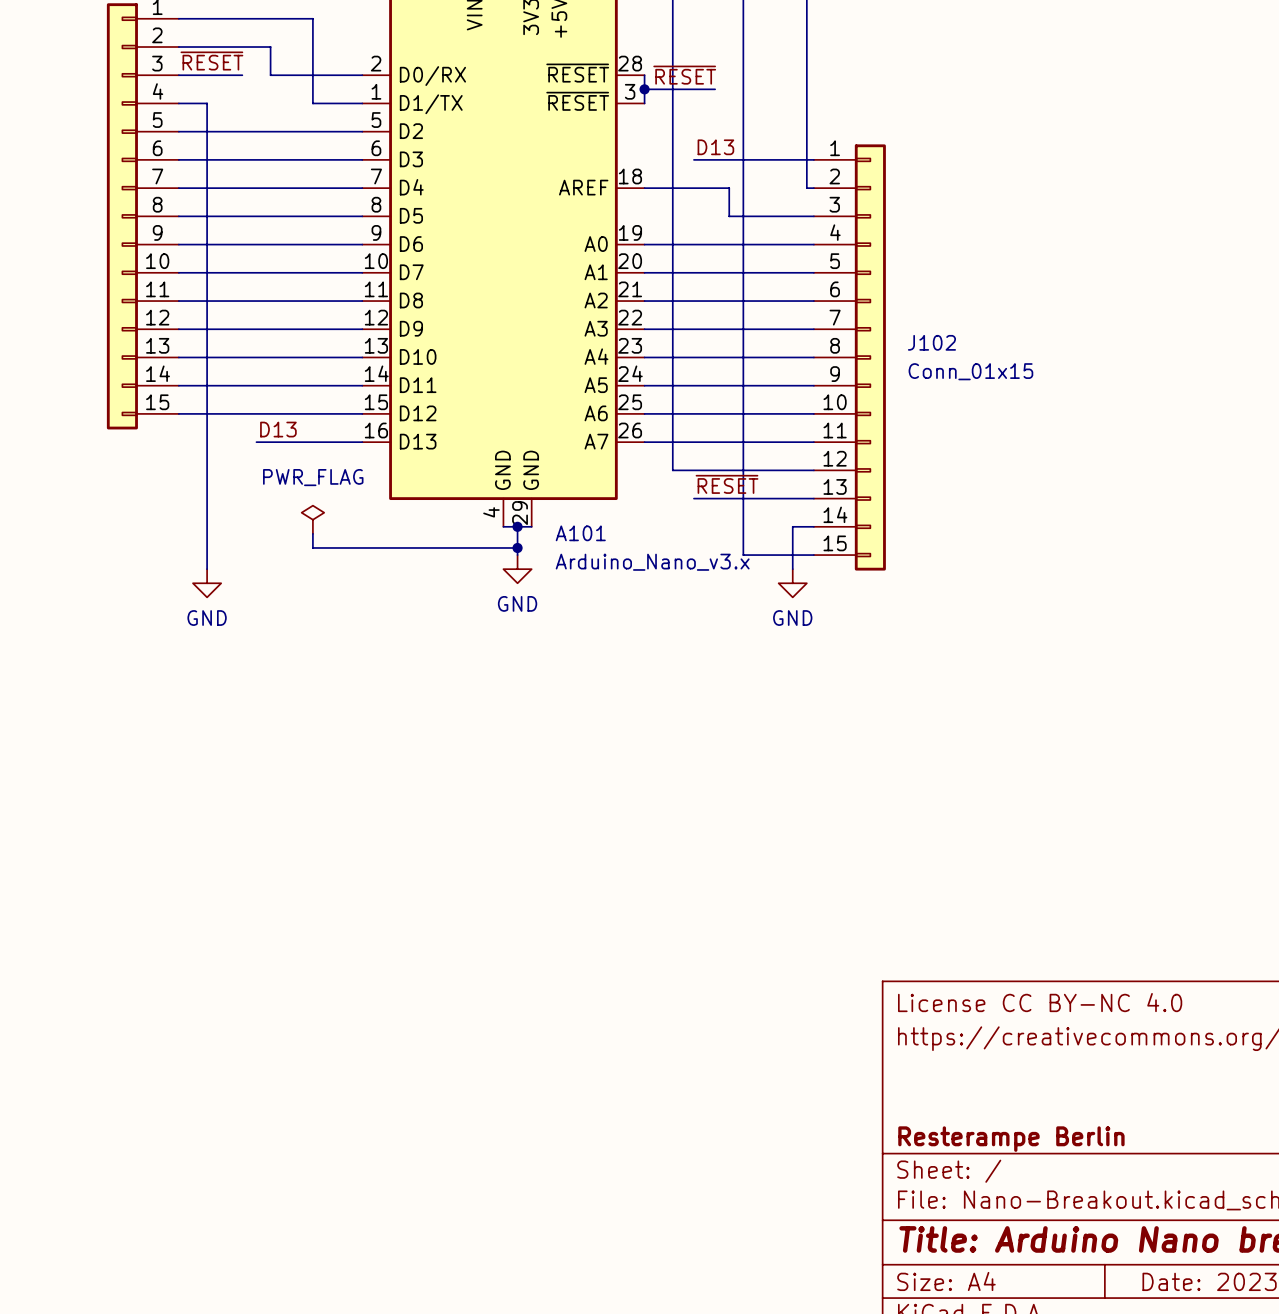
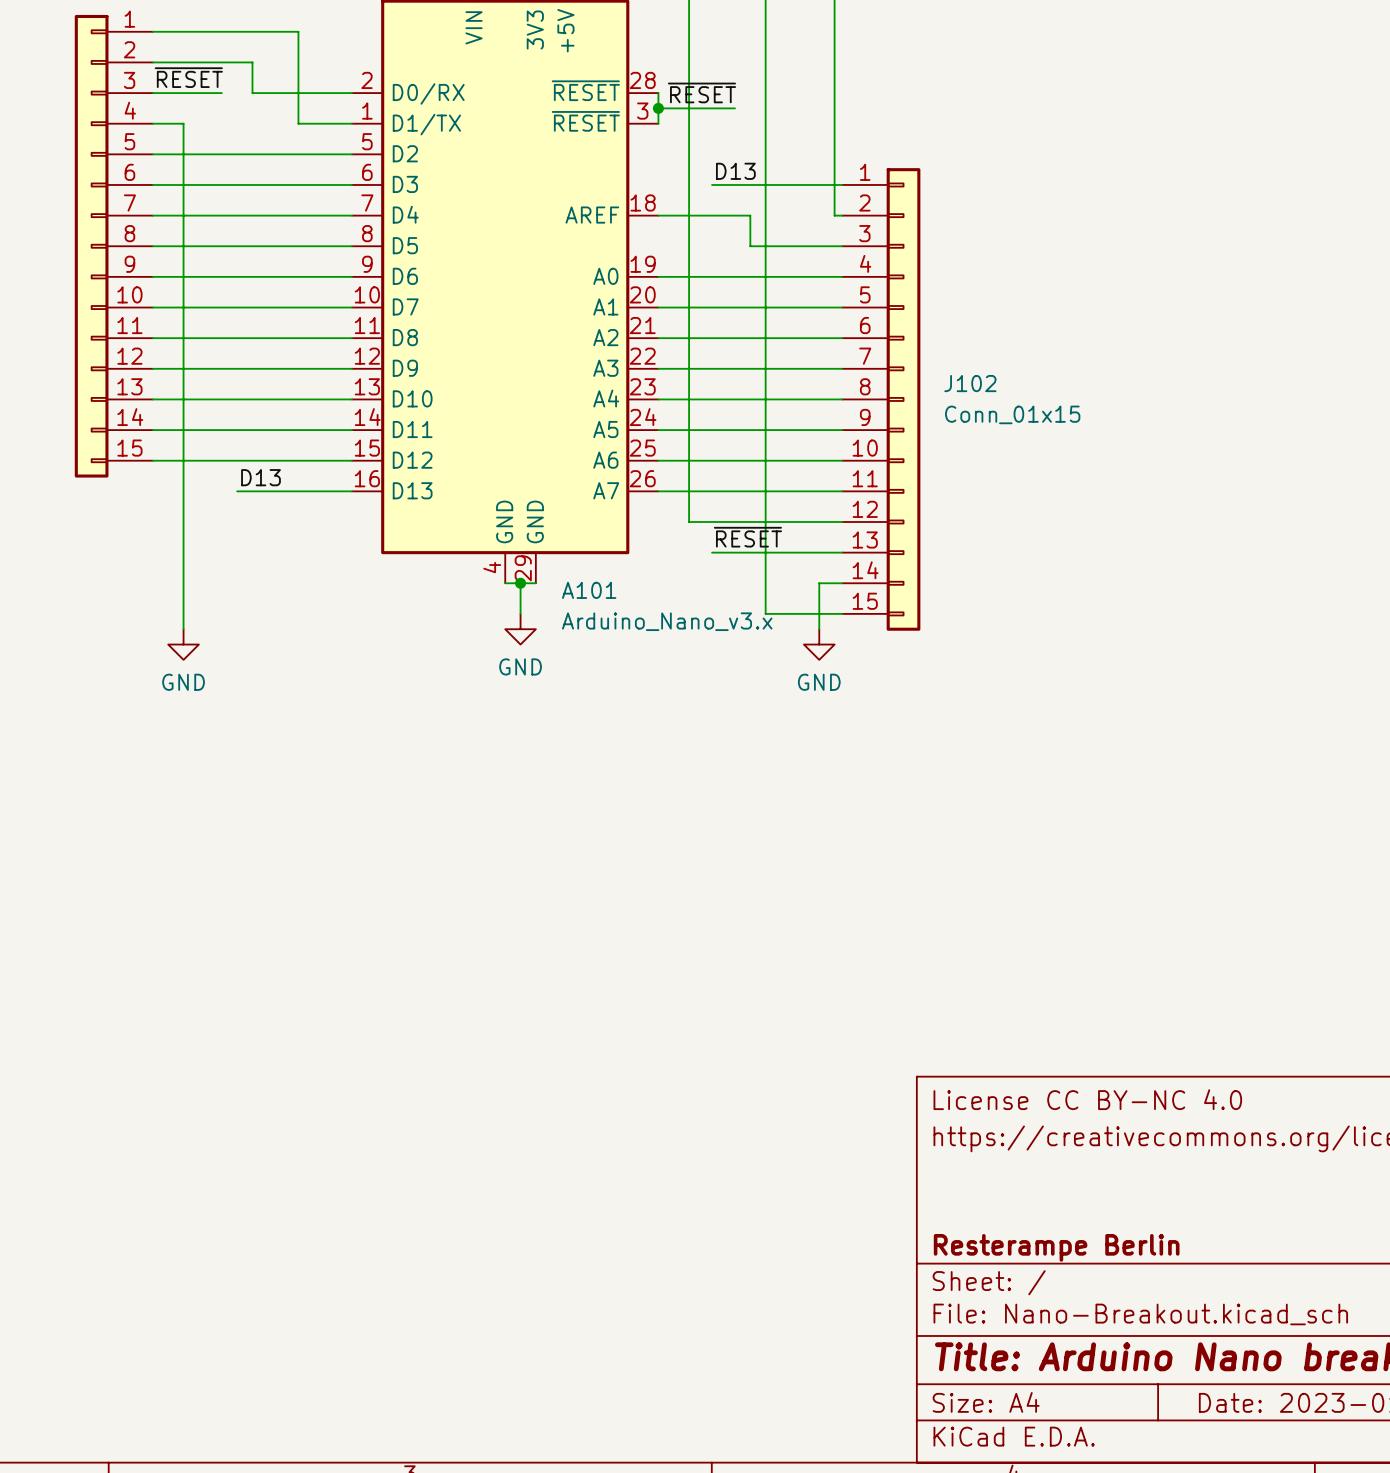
power symbol: PWR_FLAG (312, 519) -> none
wire: (312, 533) (312, 547) (517, 547) -> none
junction: (517, 547) -> none

